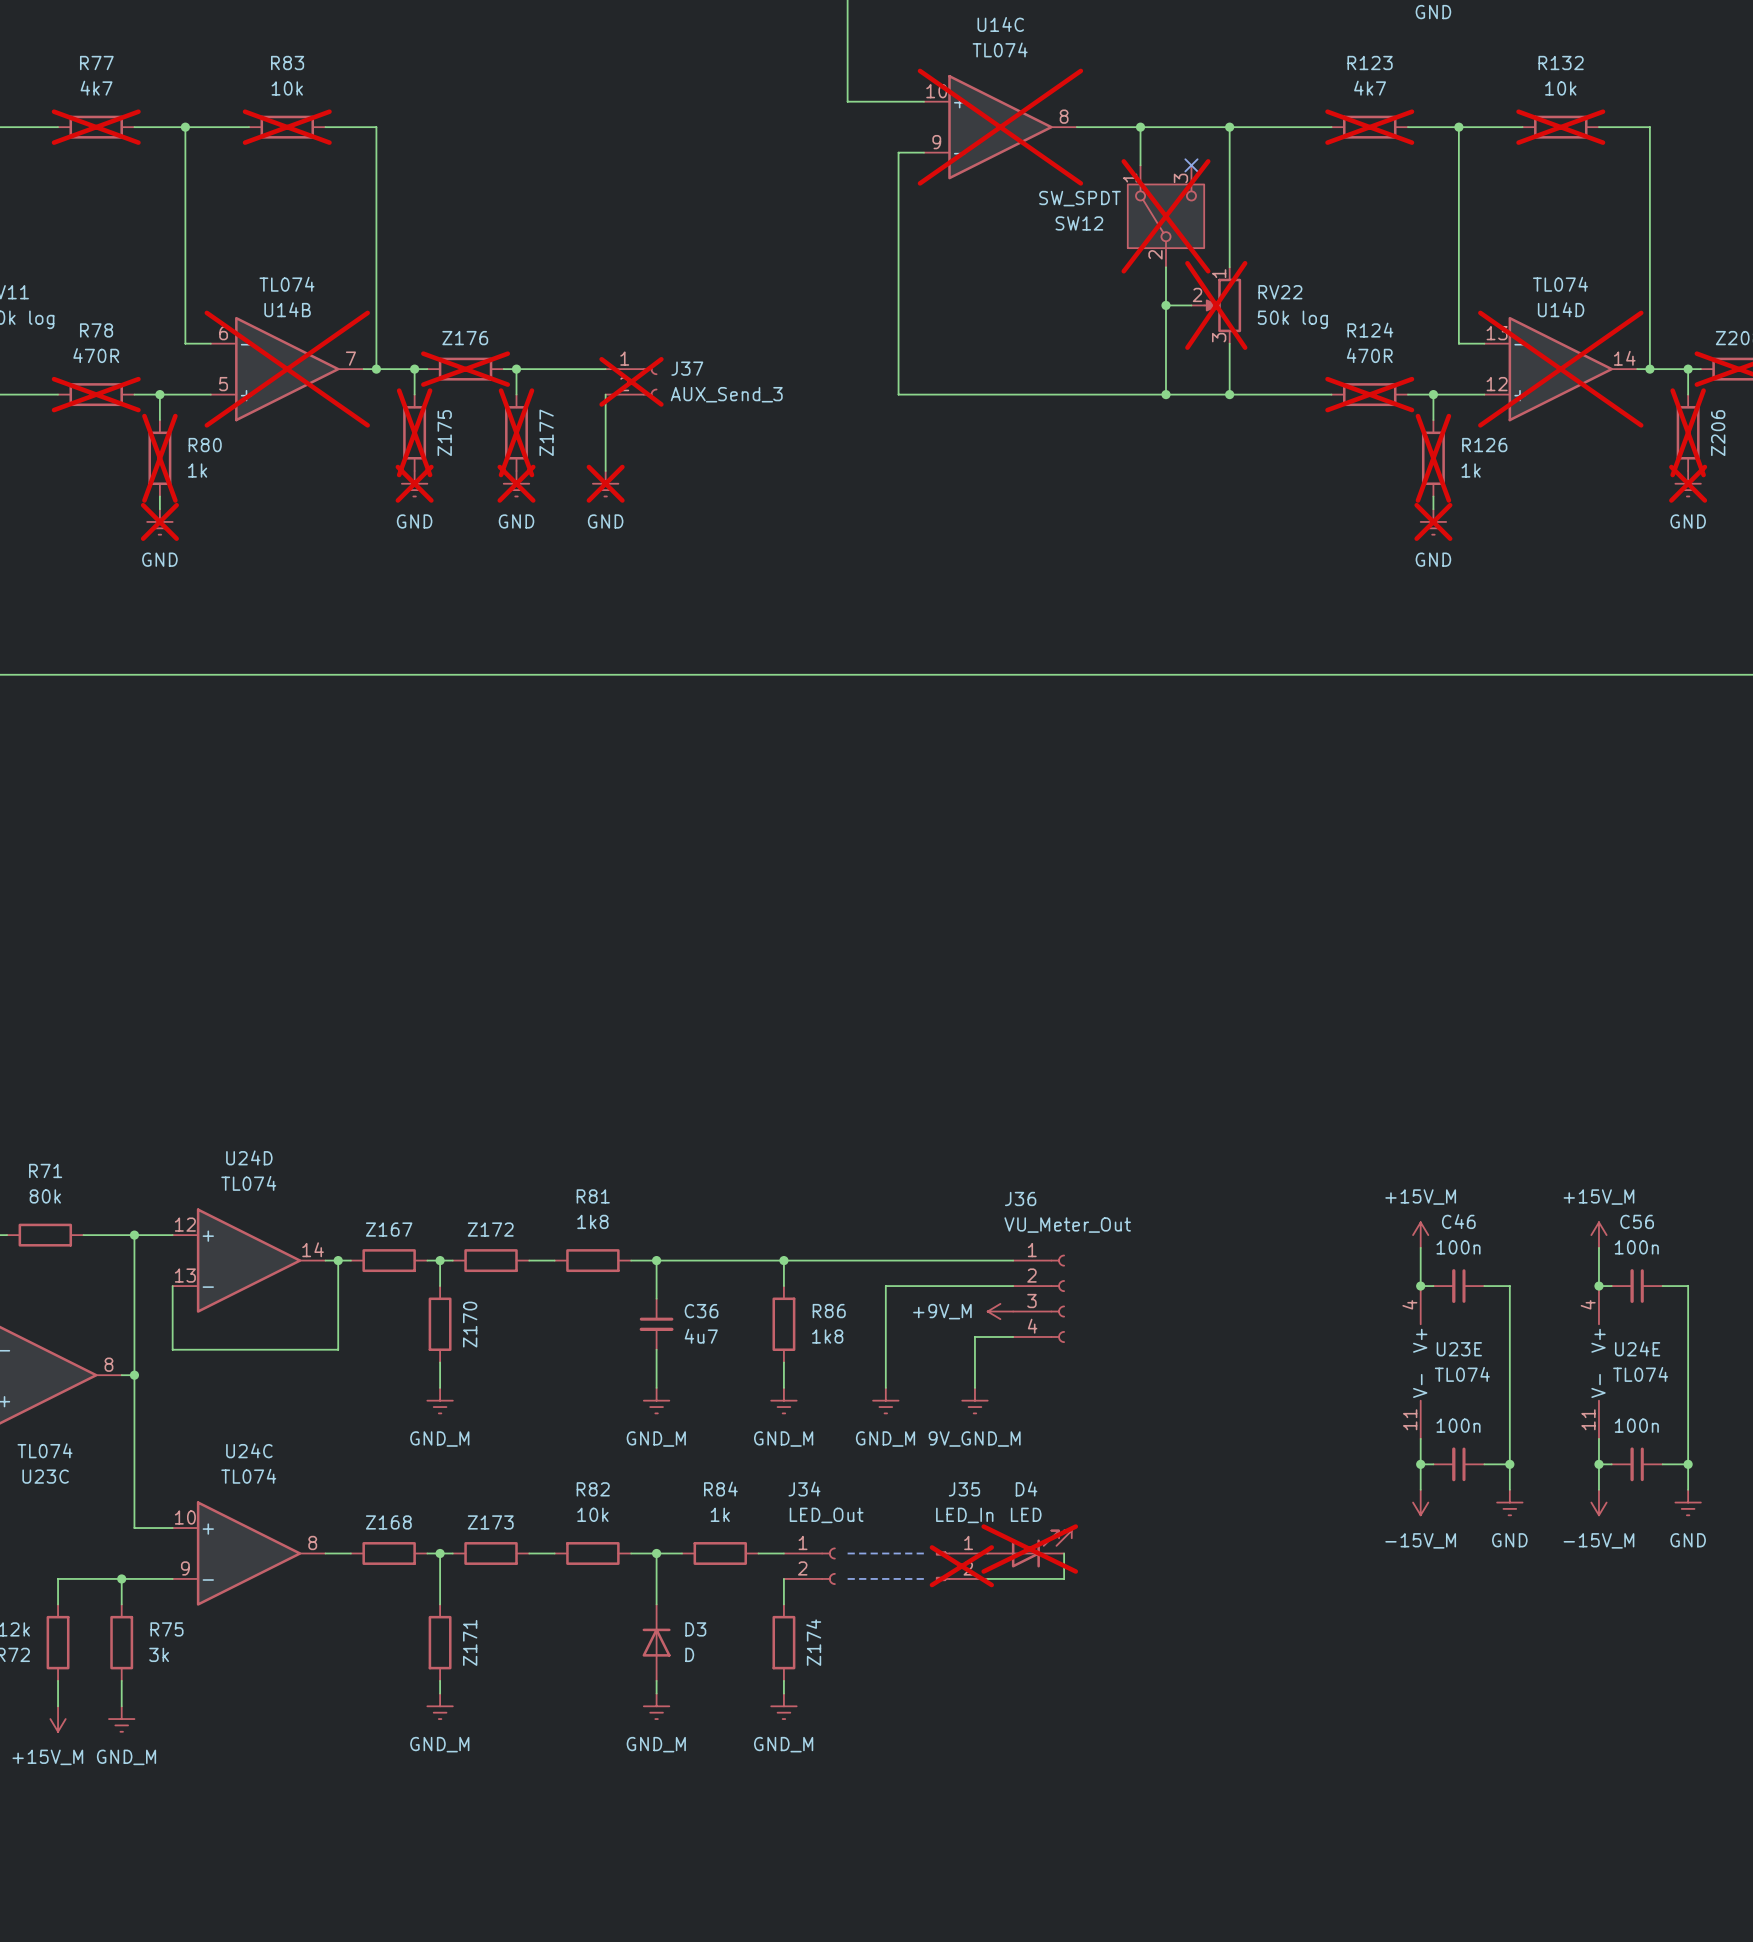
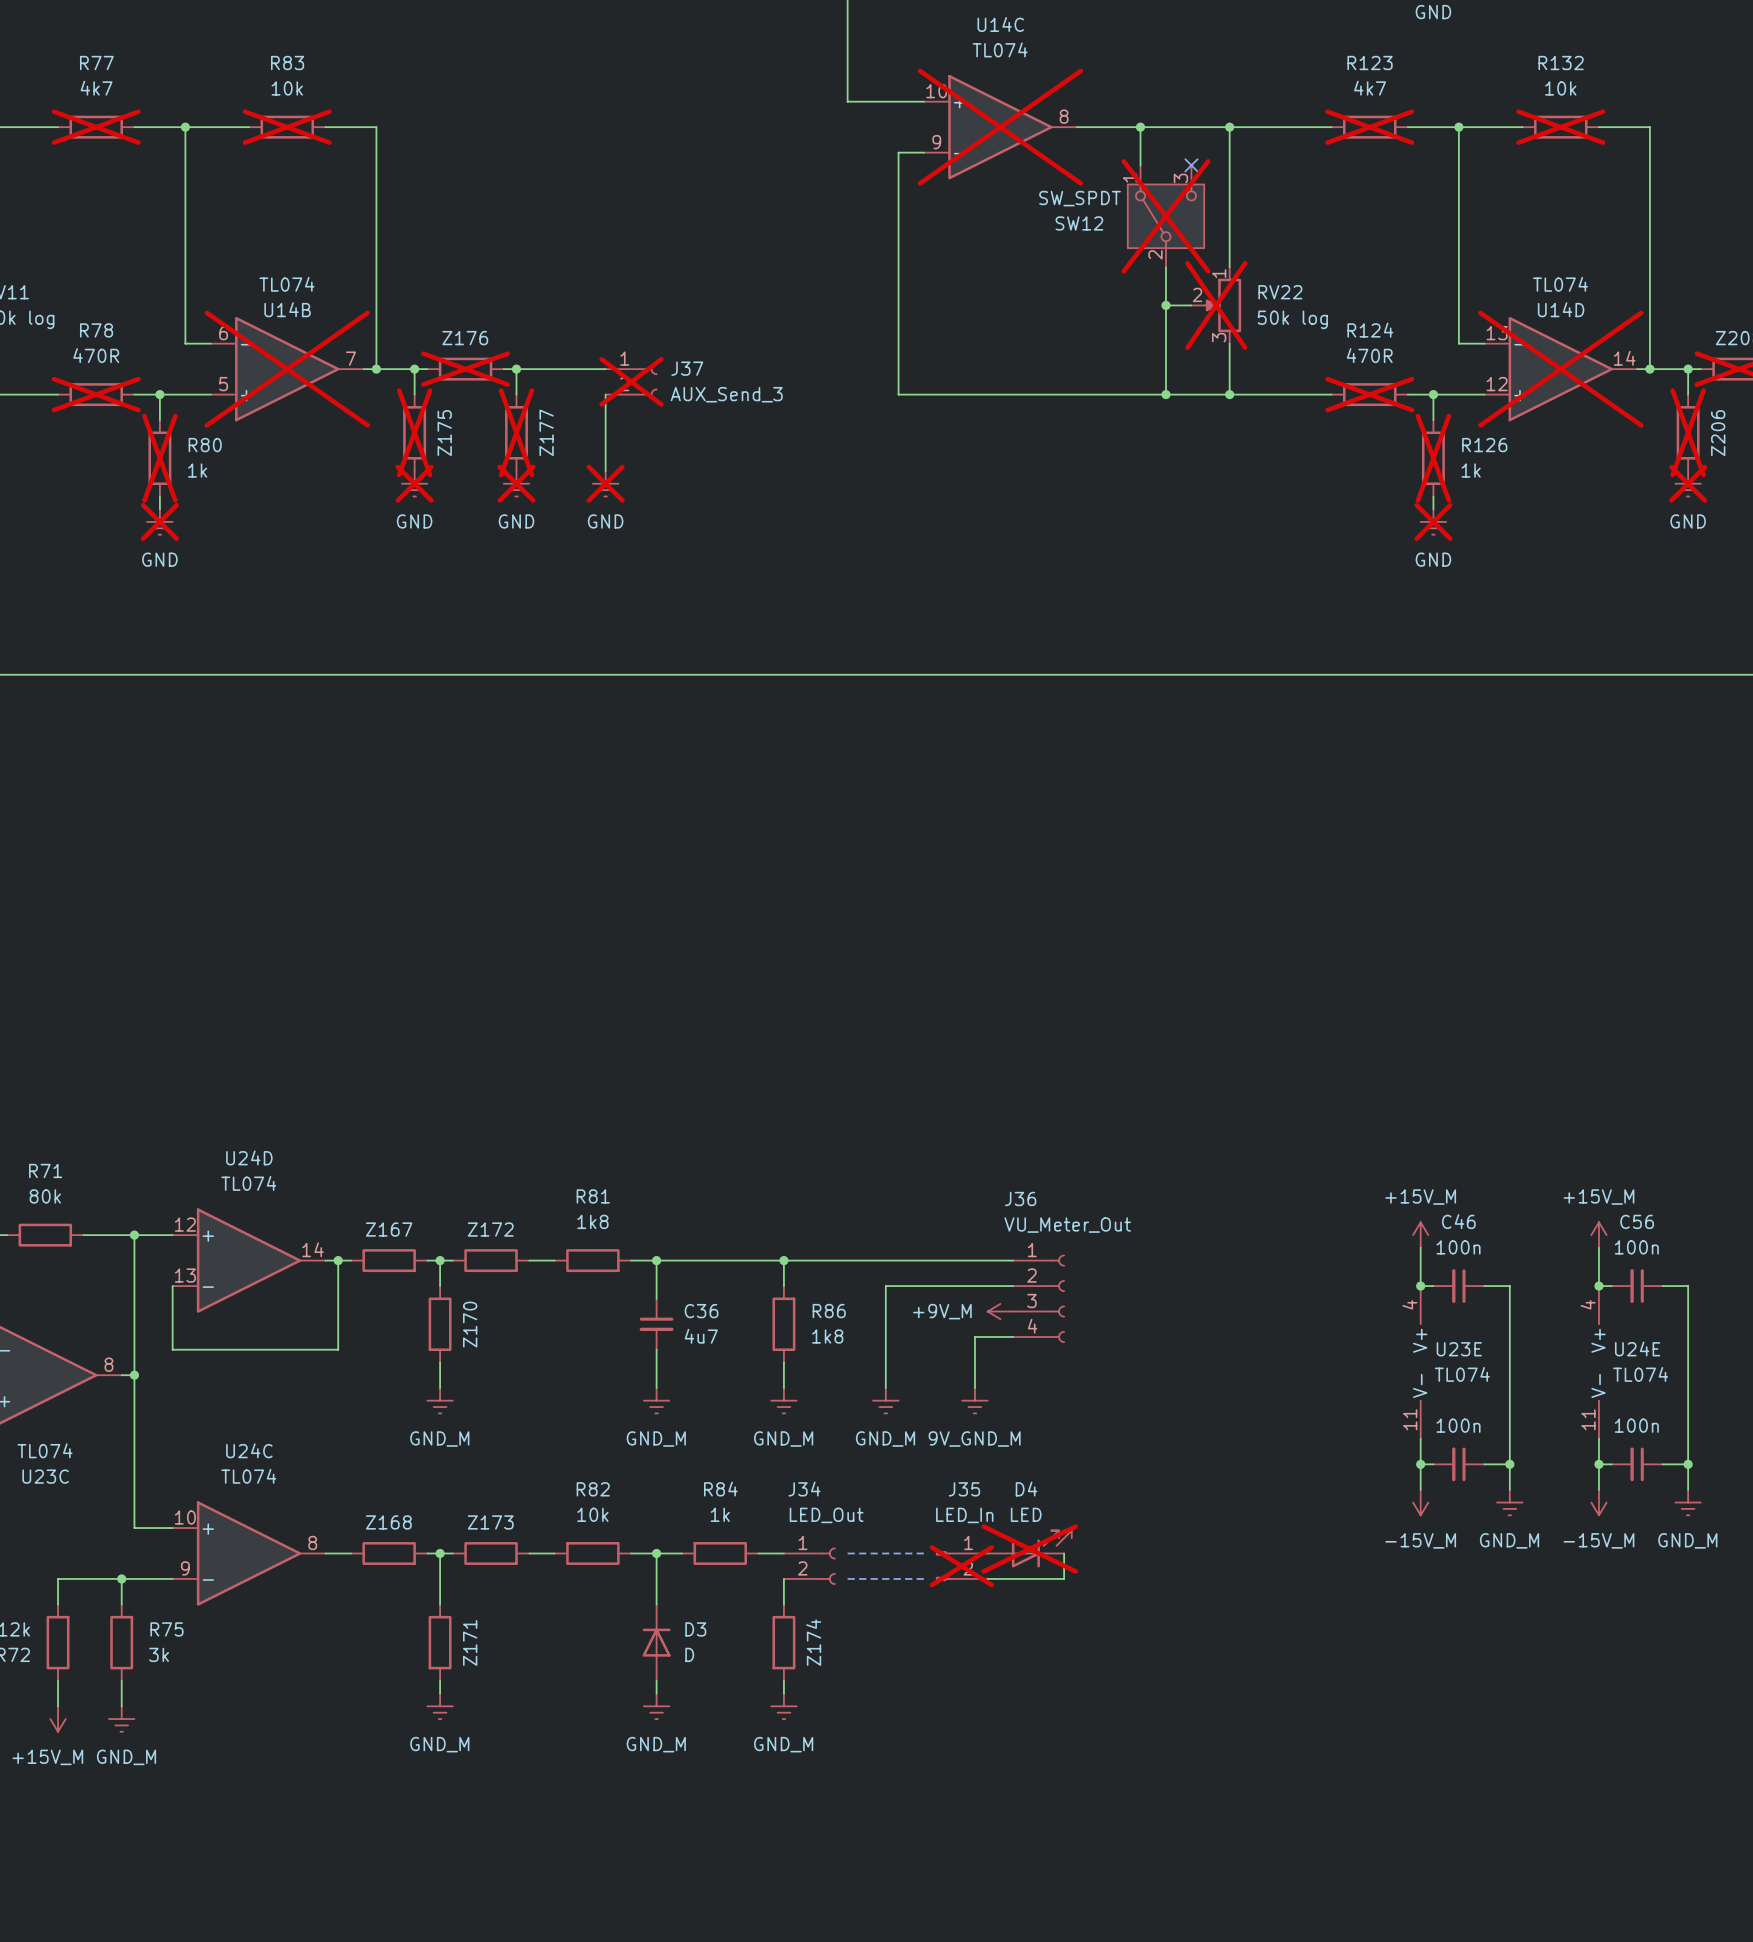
power symbol: GND (1509, 1502) -> GND_M (1509, 1502)
power symbol: GND (1688, 1502) -> GND_M (1688, 1502)

